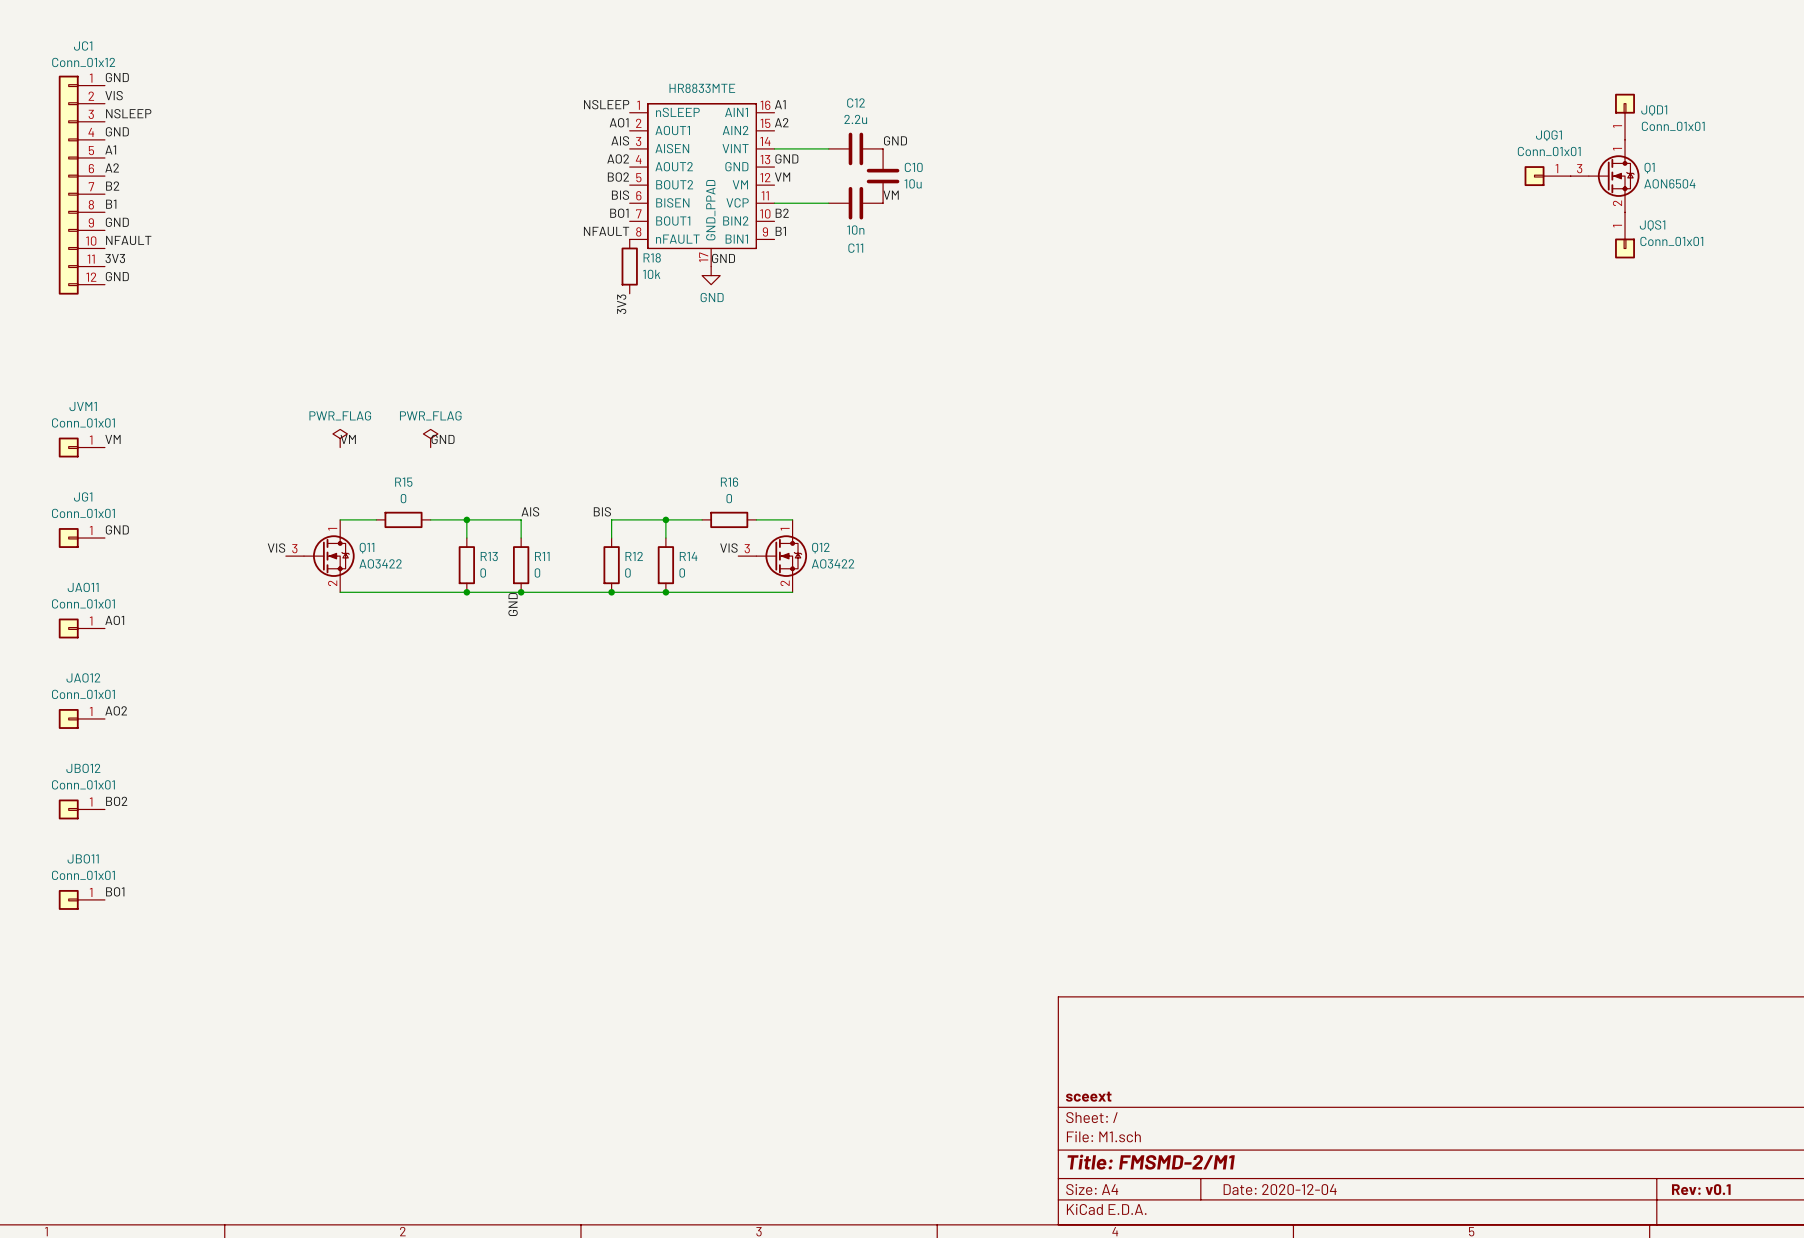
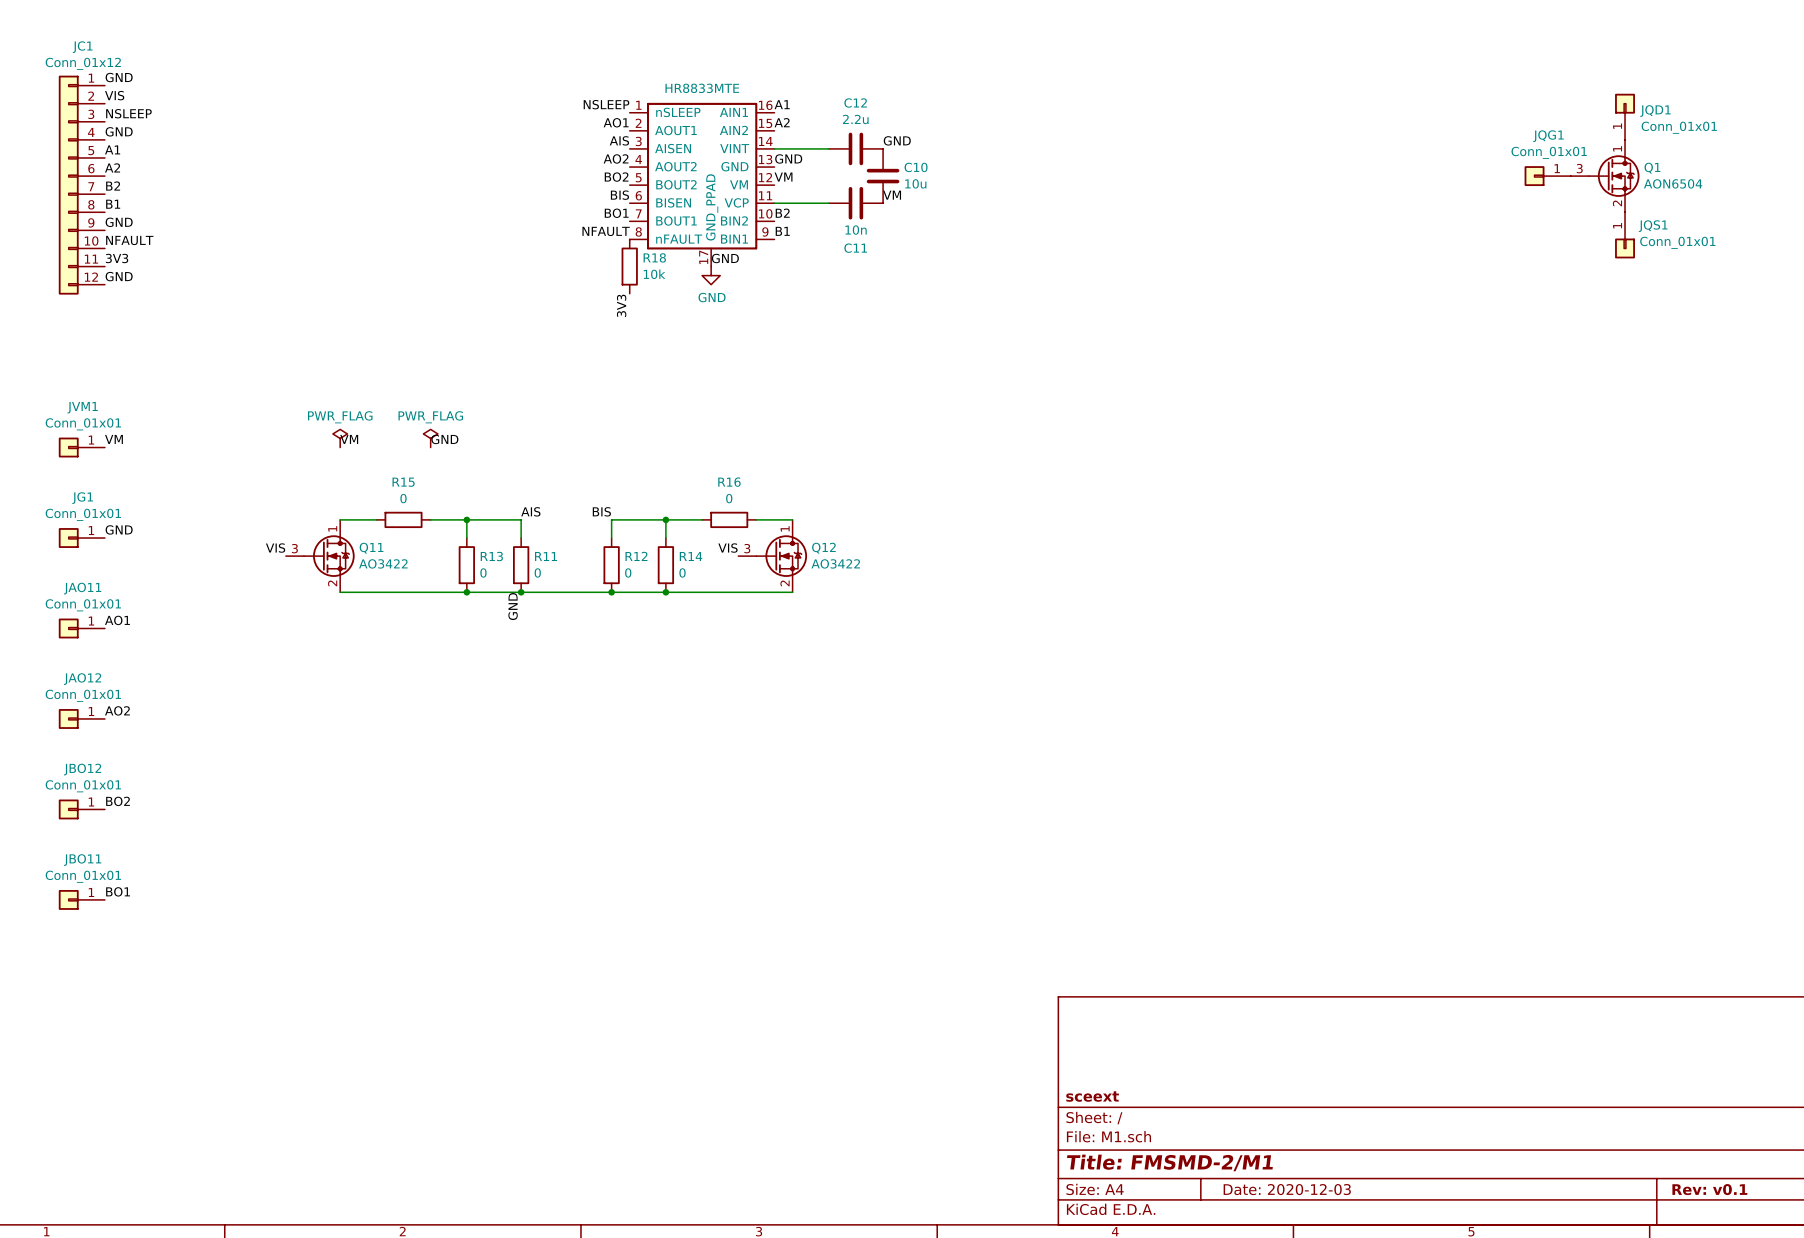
title block: Date: 2020-12-04 (1280, 1189) -> Date: 2020-12-03 (1287, 1189)

